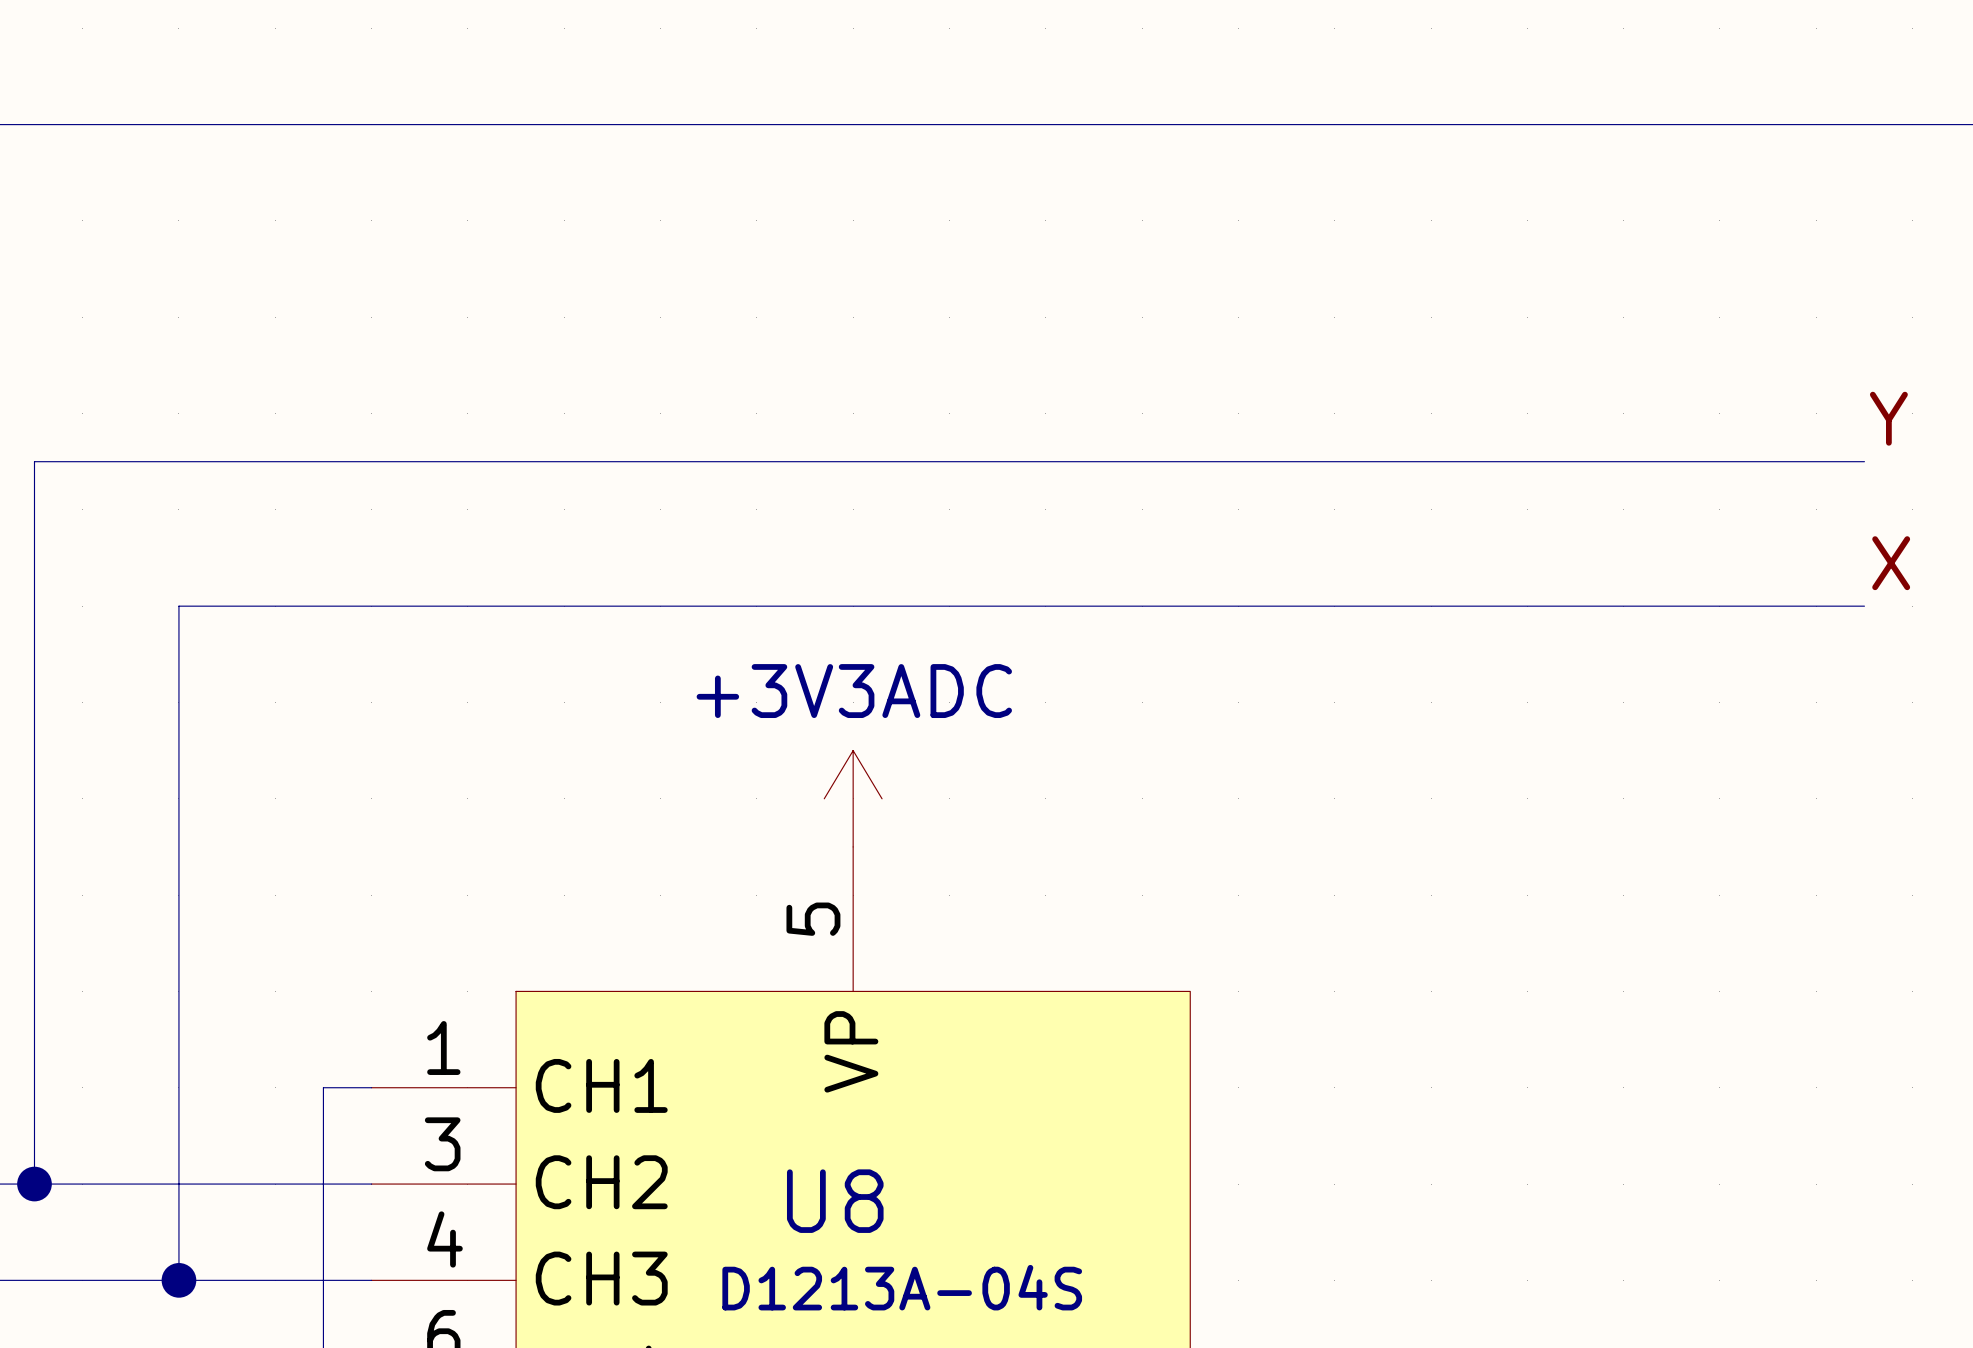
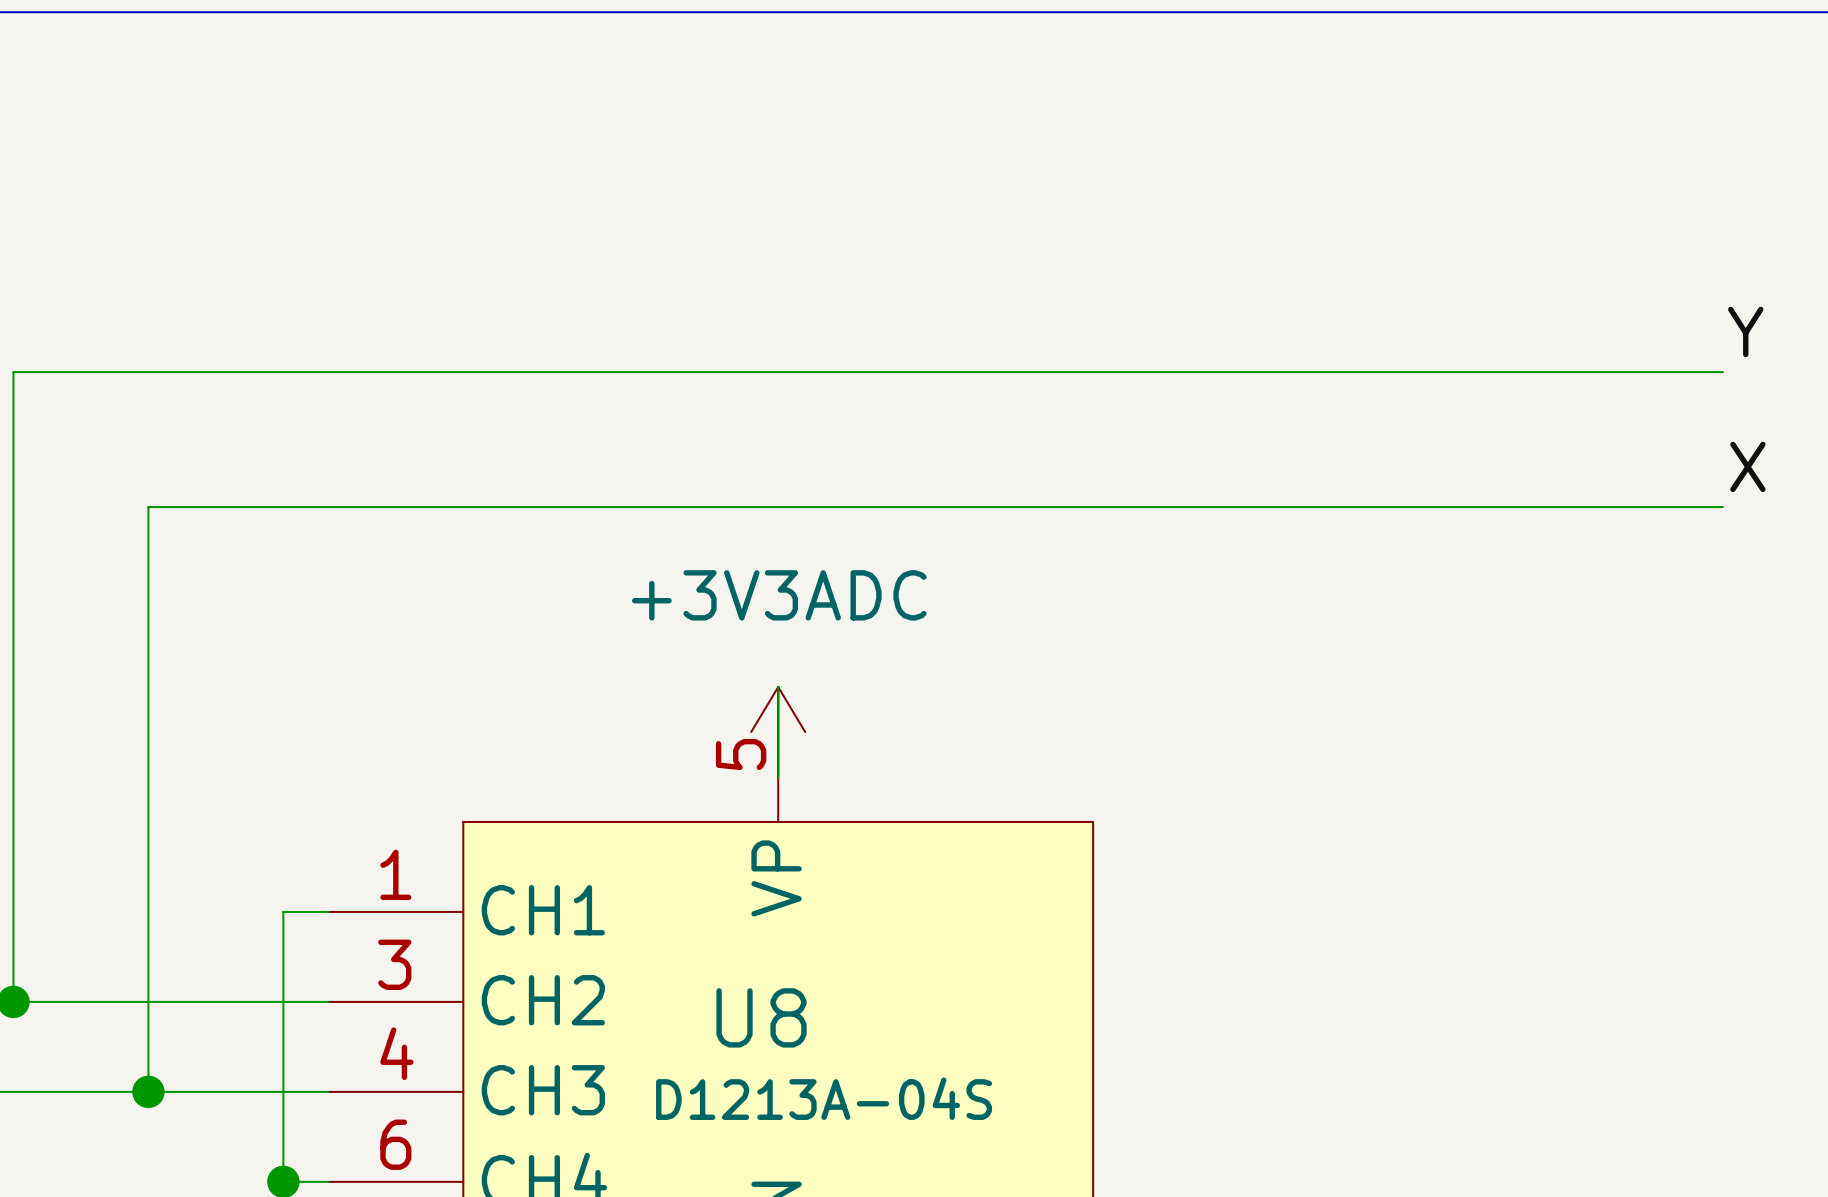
label position: Y (1888, 418) -> Y (1745, 331)
wire: (1864, 461) (34, 461) (34, 509) -> (1722, 372) (13, 372)
label position: X (1891, 563) -> X (1747, 466)
wire: (1864, 606) (178, 606) (178, 654) -> (1722, 507) (148, 507)
power symbol text position: +3V3ADC (854, 691) -> +3V3ADC (779, 595)
power symbol position: +3V3ADC (853, 798) -> +3V3ADC (778, 731)

